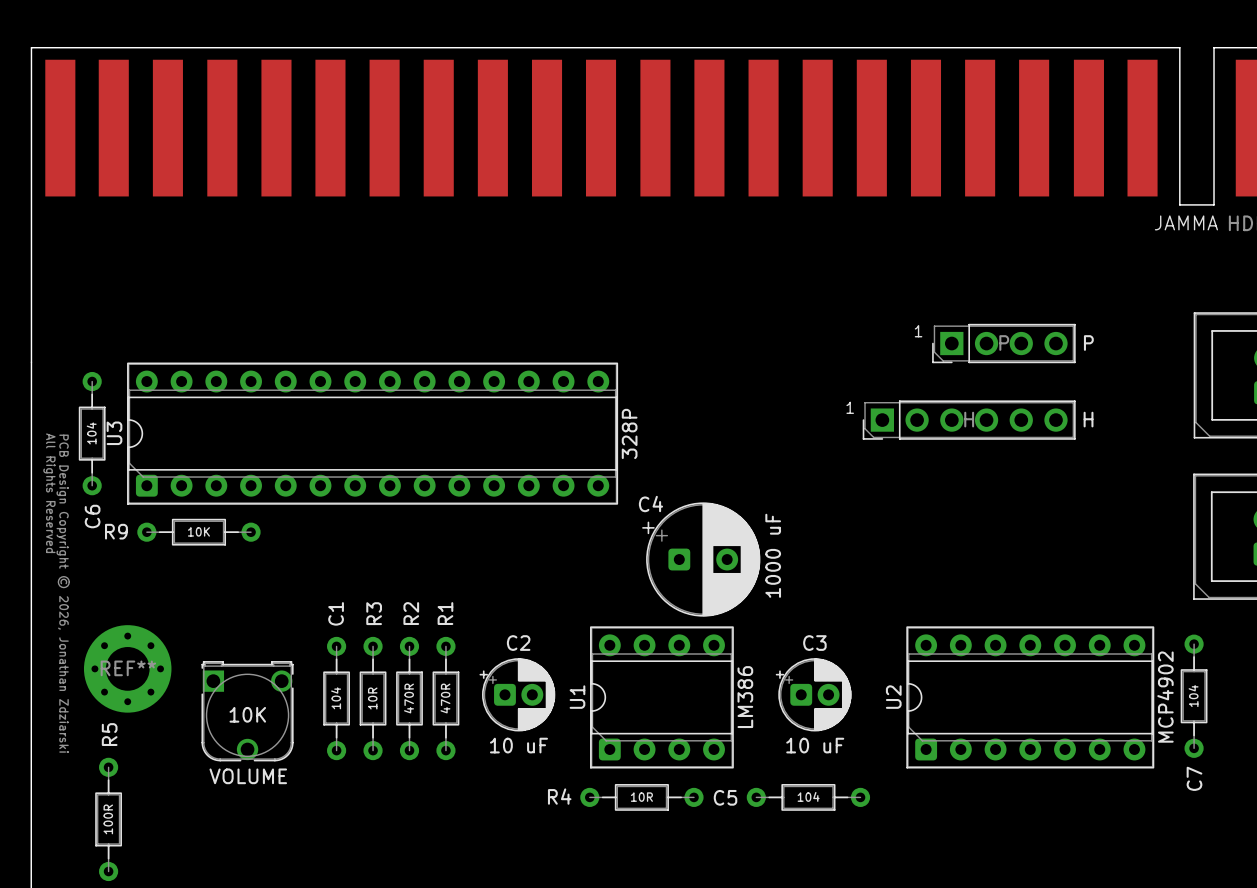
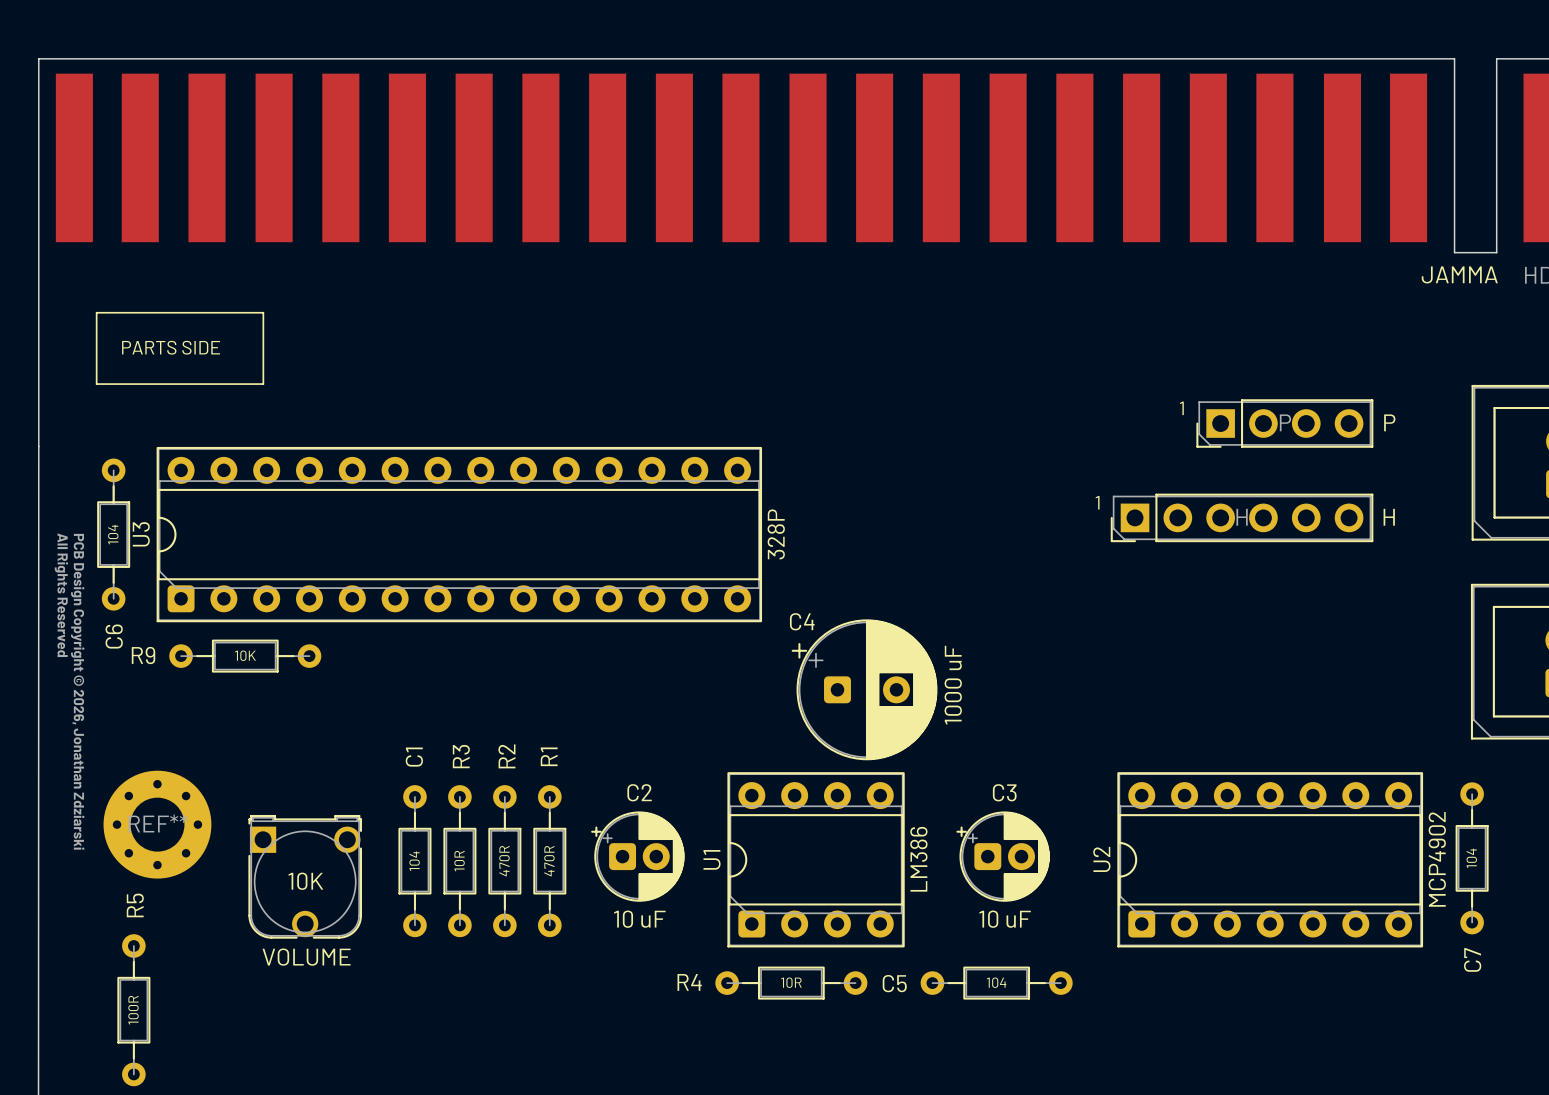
line: none -> (96, 312) (263, 312) (263, 384) (96, 384) (96, 312)
text: none -> PARTS SIDE (171, 347)
text: 1 (918, 331) -> none
text: none -> 1 (1181, 408)
P position: (1003, 343) -> (1284, 423)
text: 1 (850, 407) -> none
text: none -> 1 (1097, 502)
H position: (969, 420) -> (1242, 517)

